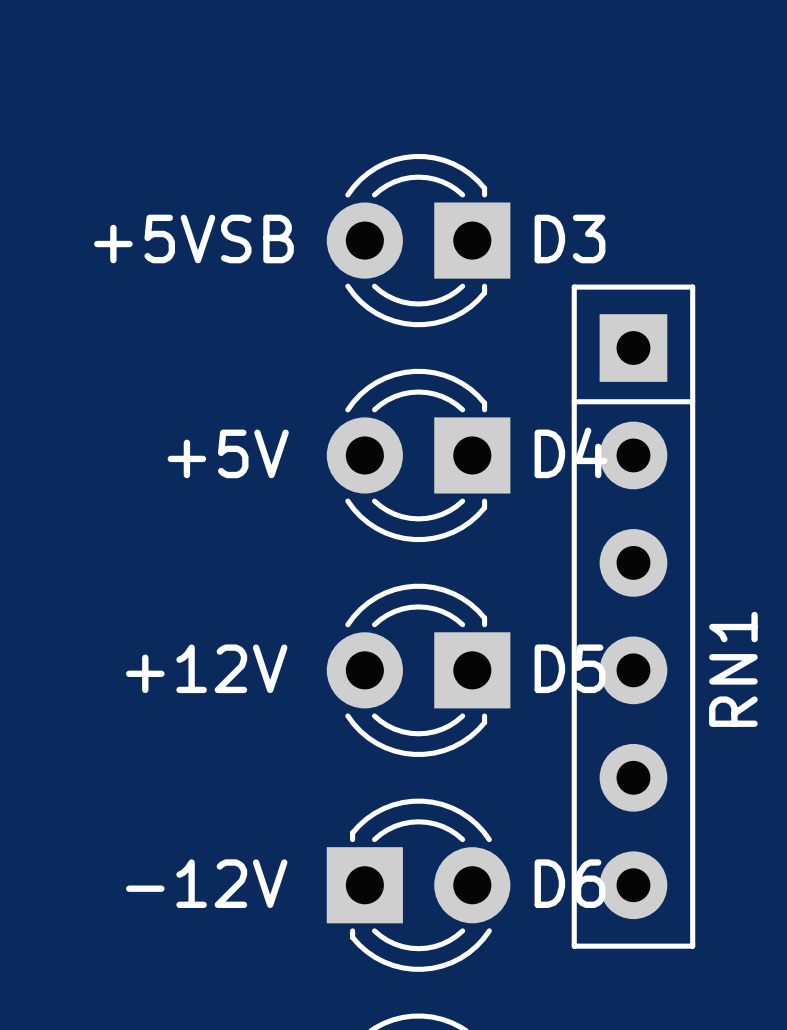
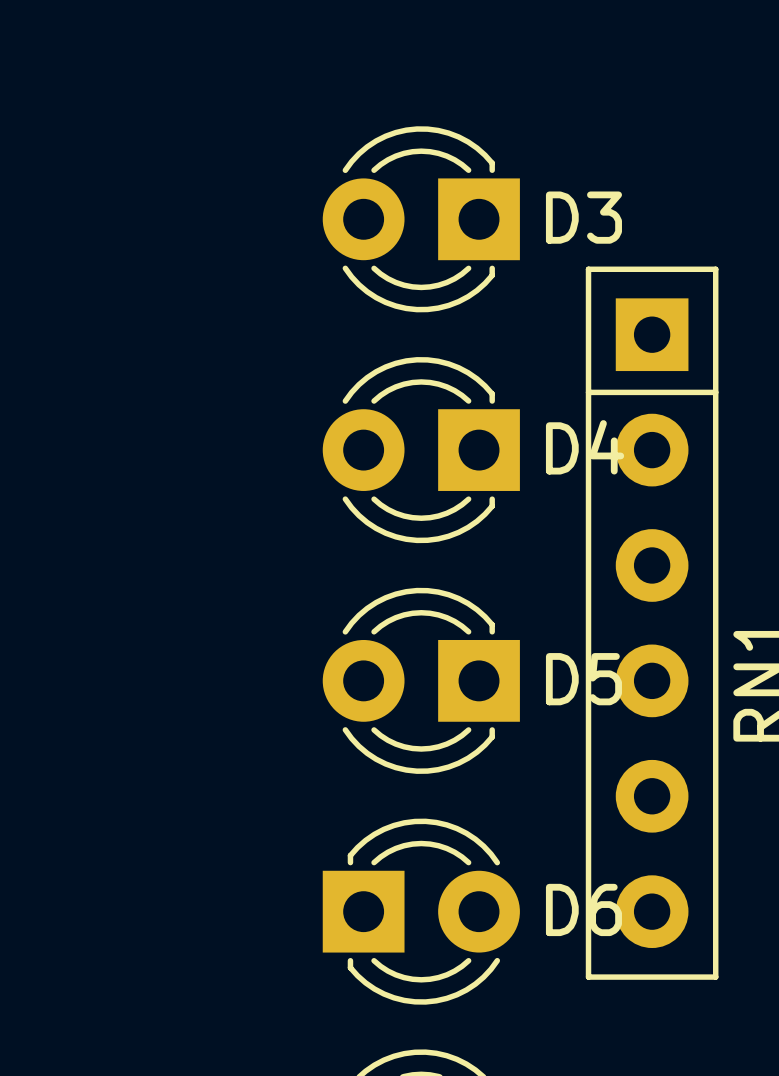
text: +5VSB (193, 238) -> none
text: +5V (228, 453) -> none
text: +12V (206, 668) -> none
text: -12V (206, 883) -> none

